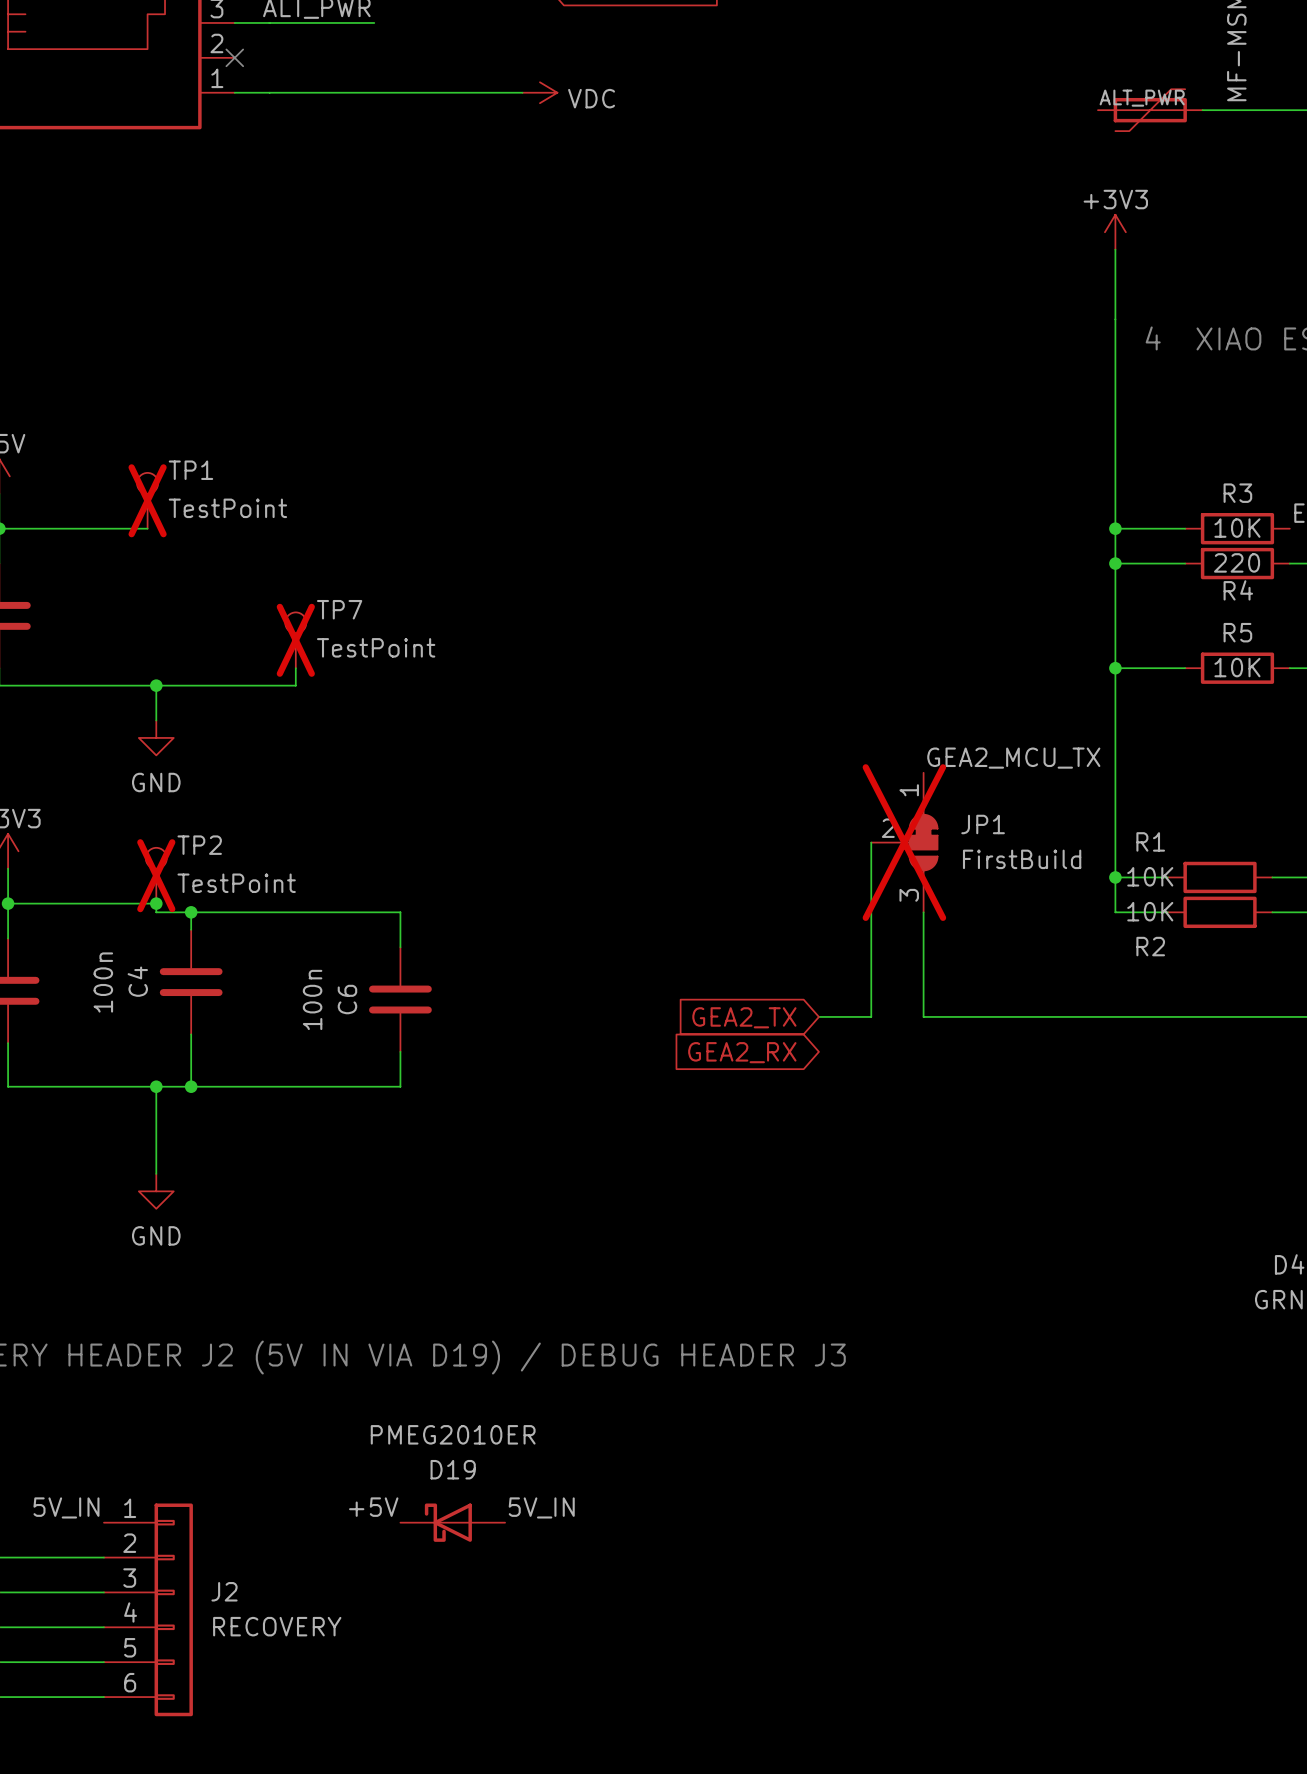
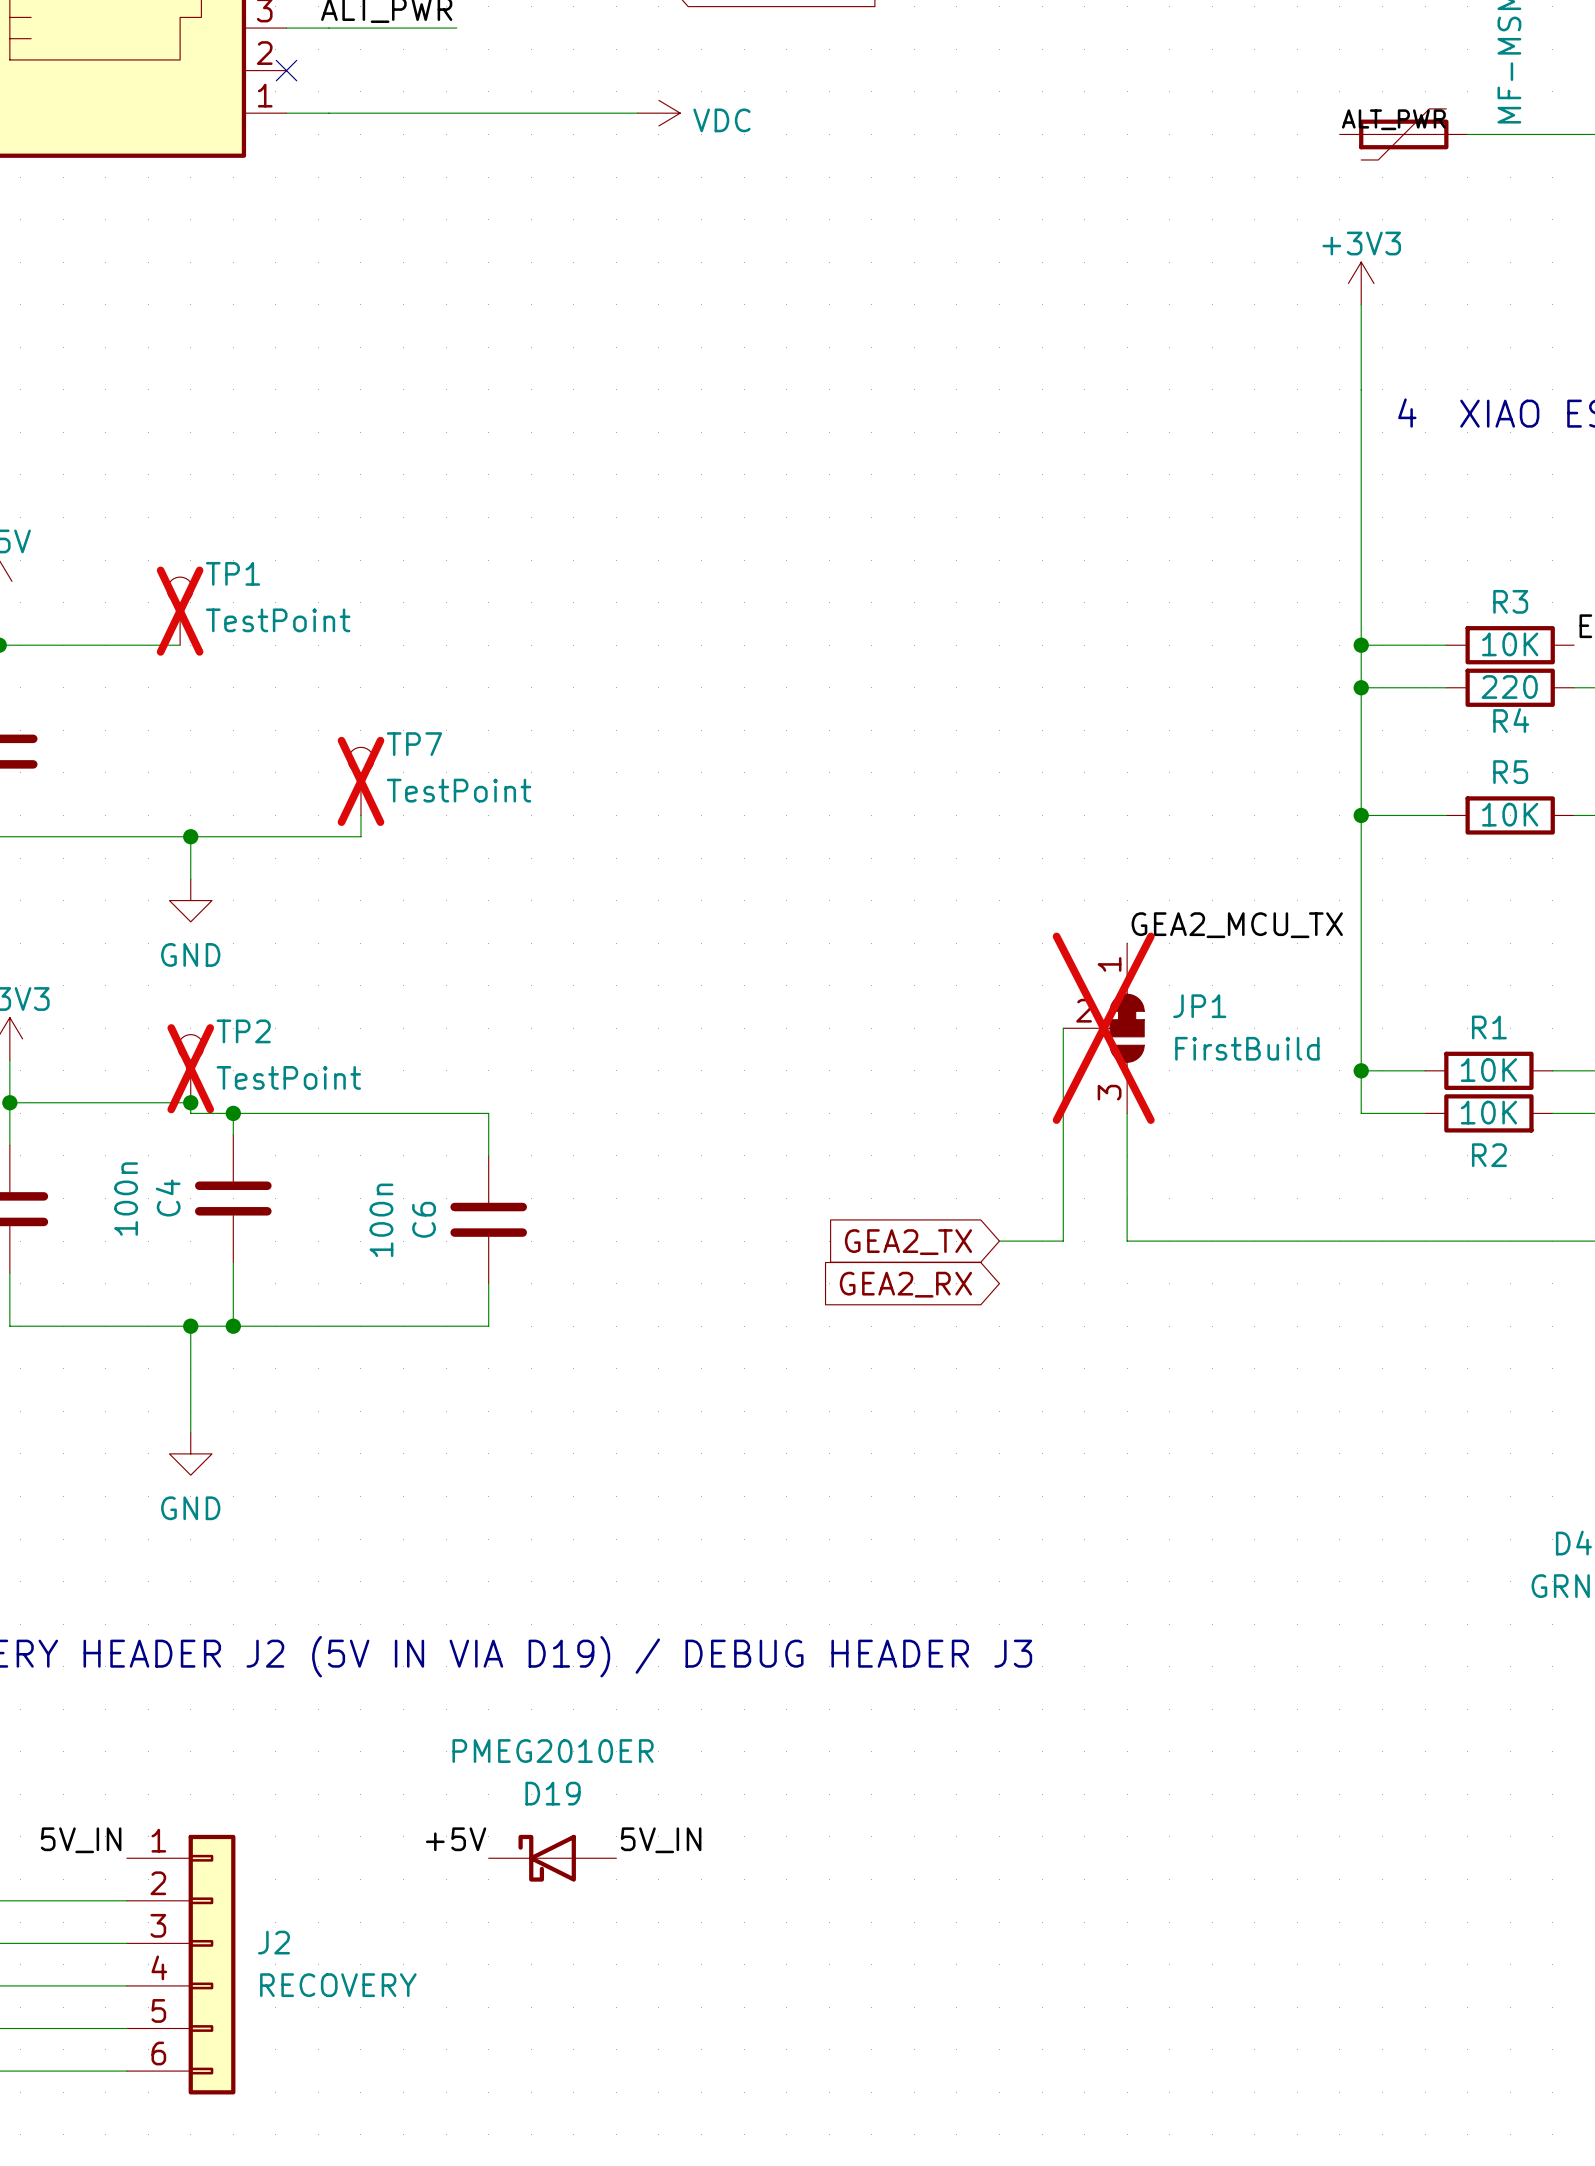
R1 name position: R1 (1150, 841) -> R1 (1489, 1027)
R1 value position: 10K (1150, 876) -> 10K (1488, 1070)
R2 value position: 10K (1150, 911) -> 10K (1488, 1112)
R2 name position: R2 (1150, 946) -> R2 (1489, 1155)

